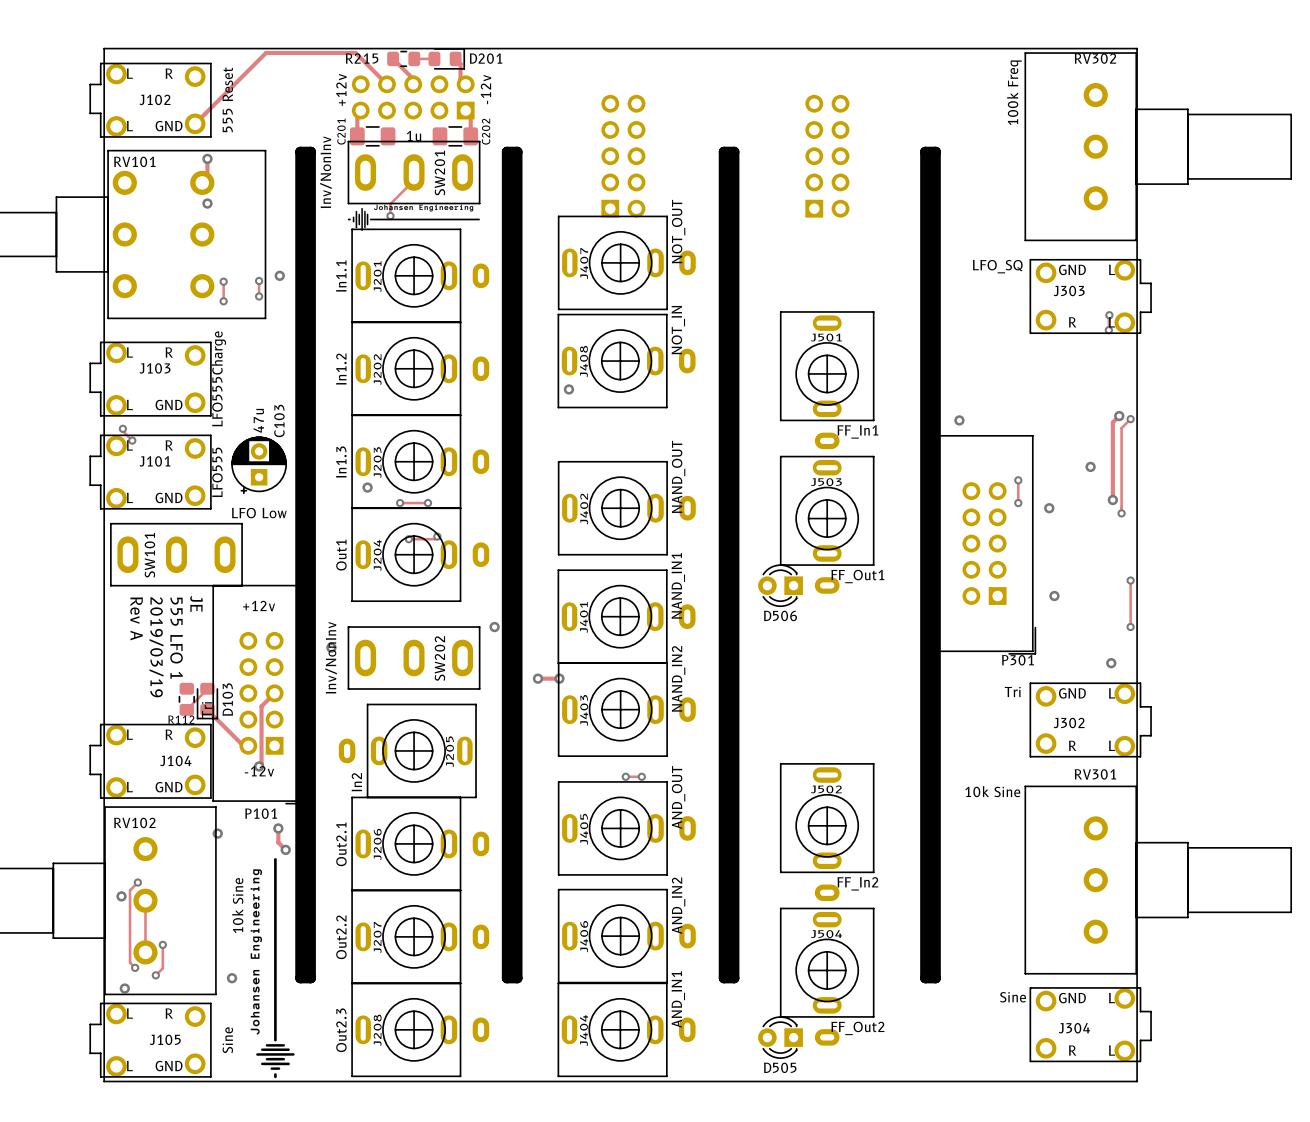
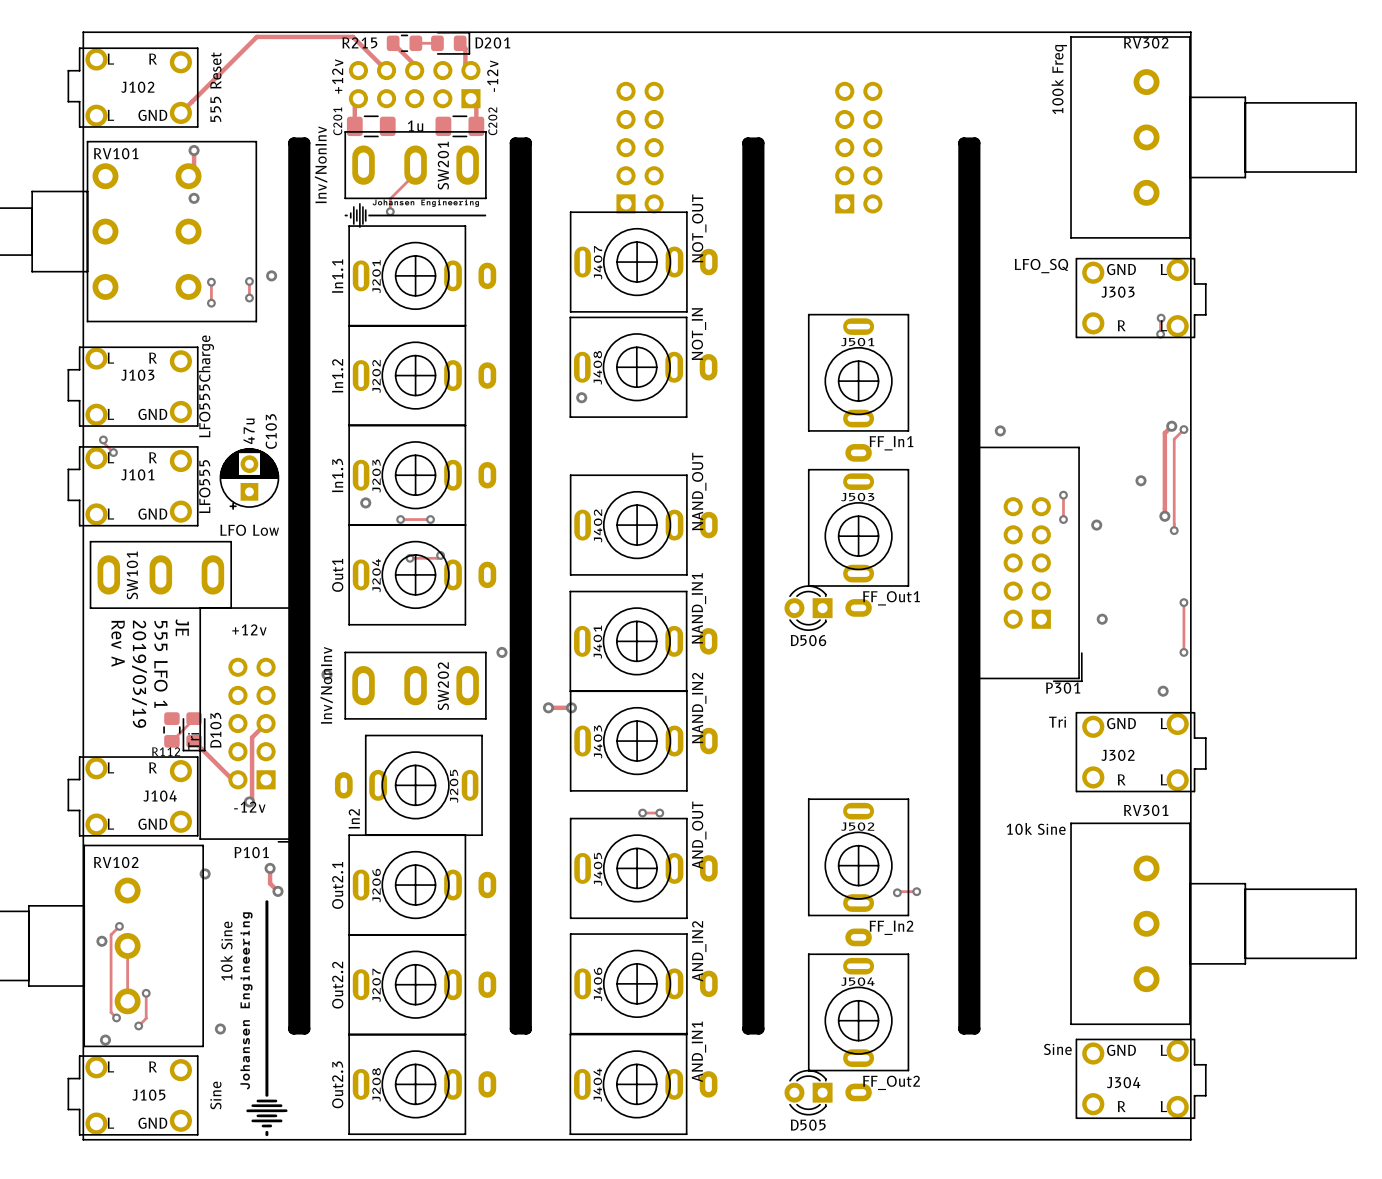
track: none -> (916, 891) (897, 892)
via: none -> (916, 891)
via: none -> (897, 892)

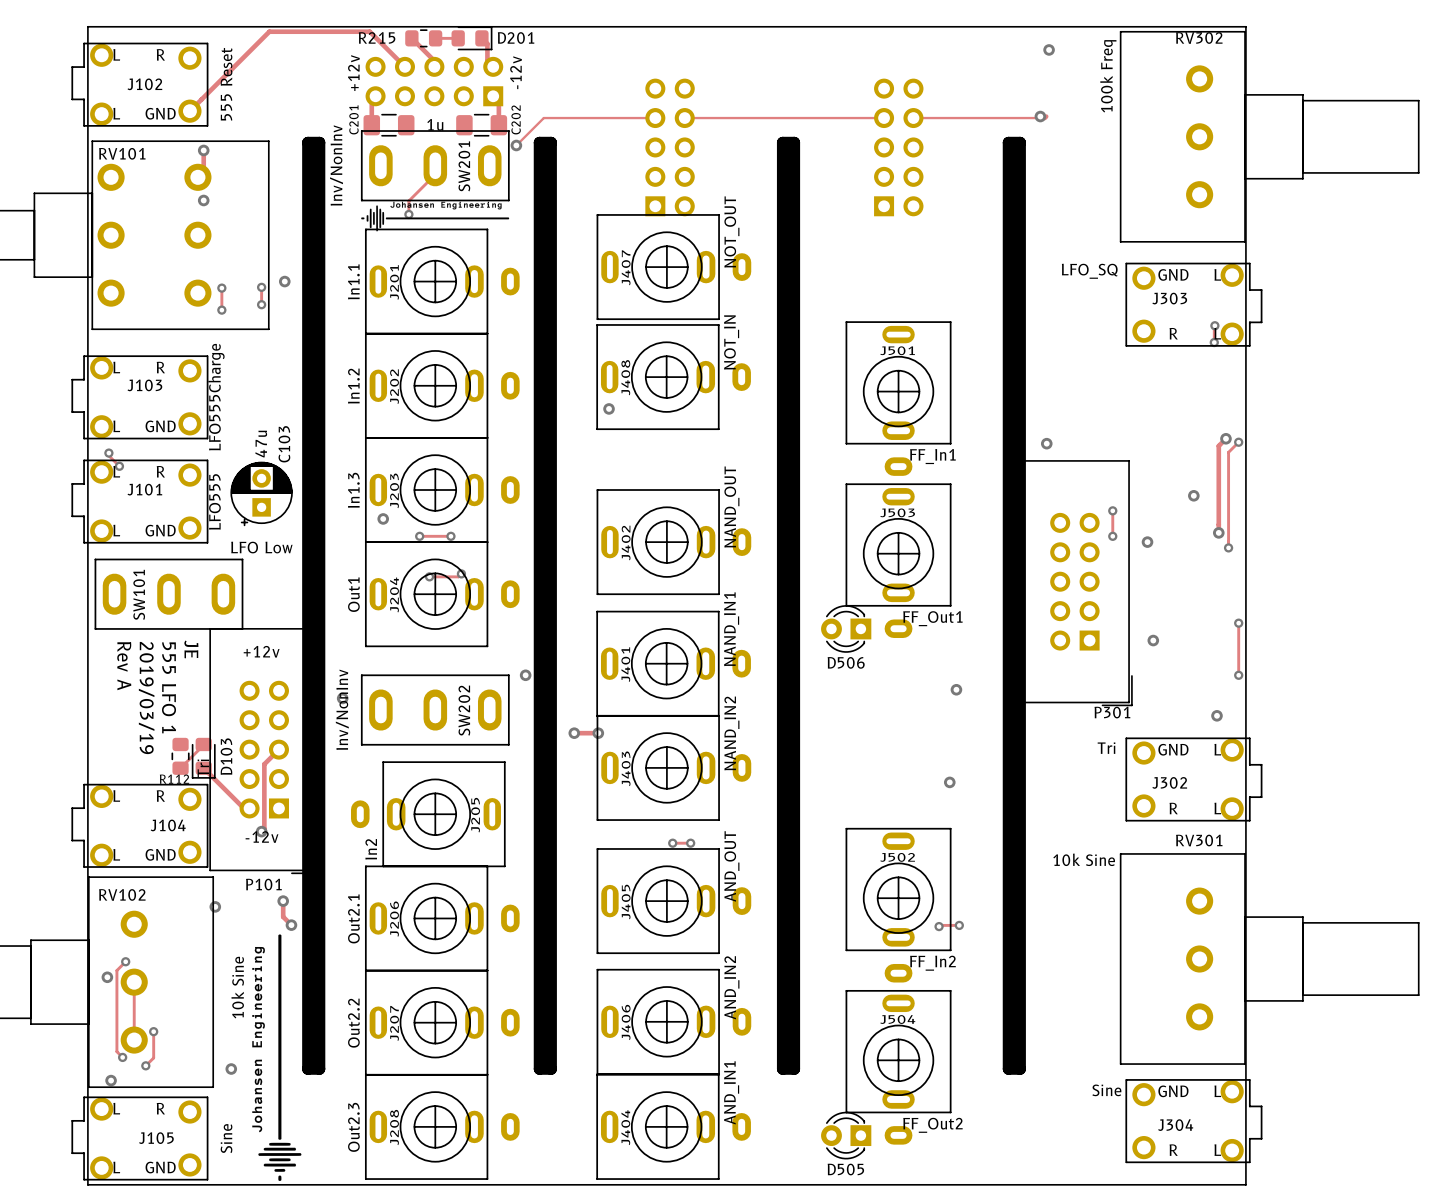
via: none -> (1049, 49)
via: none -> (1040, 116)
track: none -> (1046, 116) (913, 118)
track: none -> (655, 118) (543, 118) (516, 145)
track: none -> (684, 118) (884, 118)
via: none -> (516, 145)
via: none -> (956, 689)
via: none -> (949, 782)

